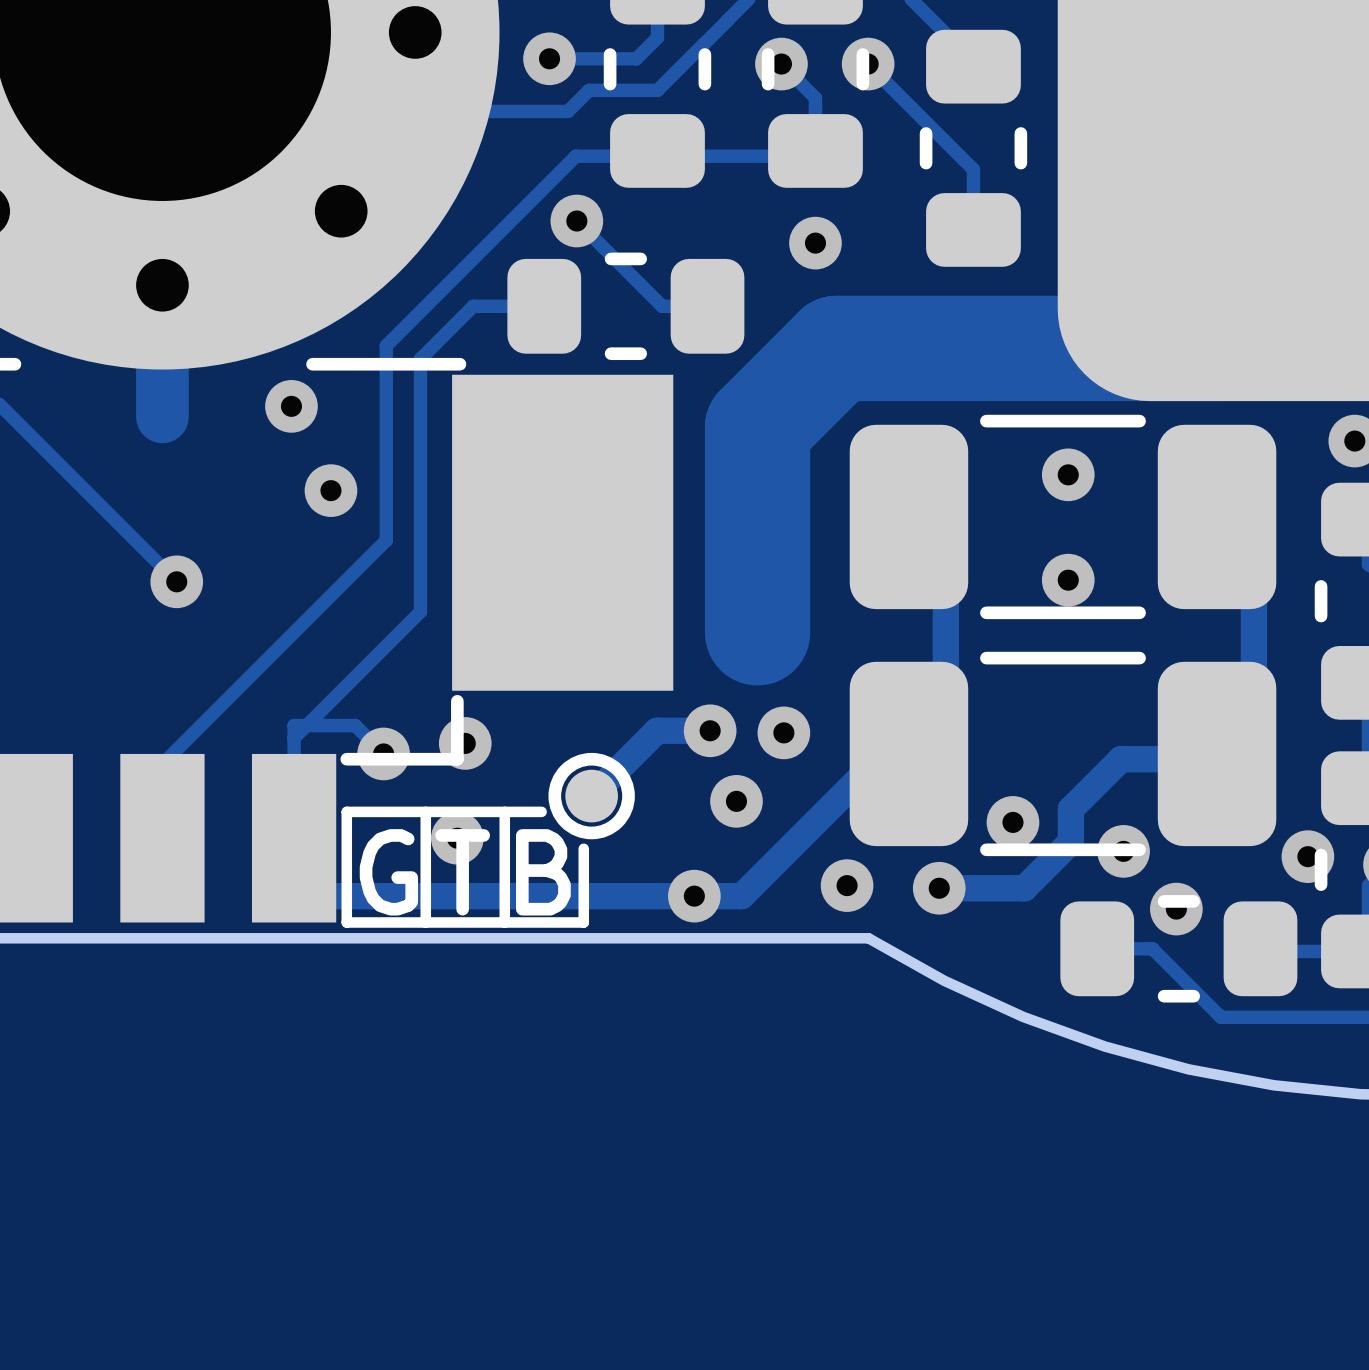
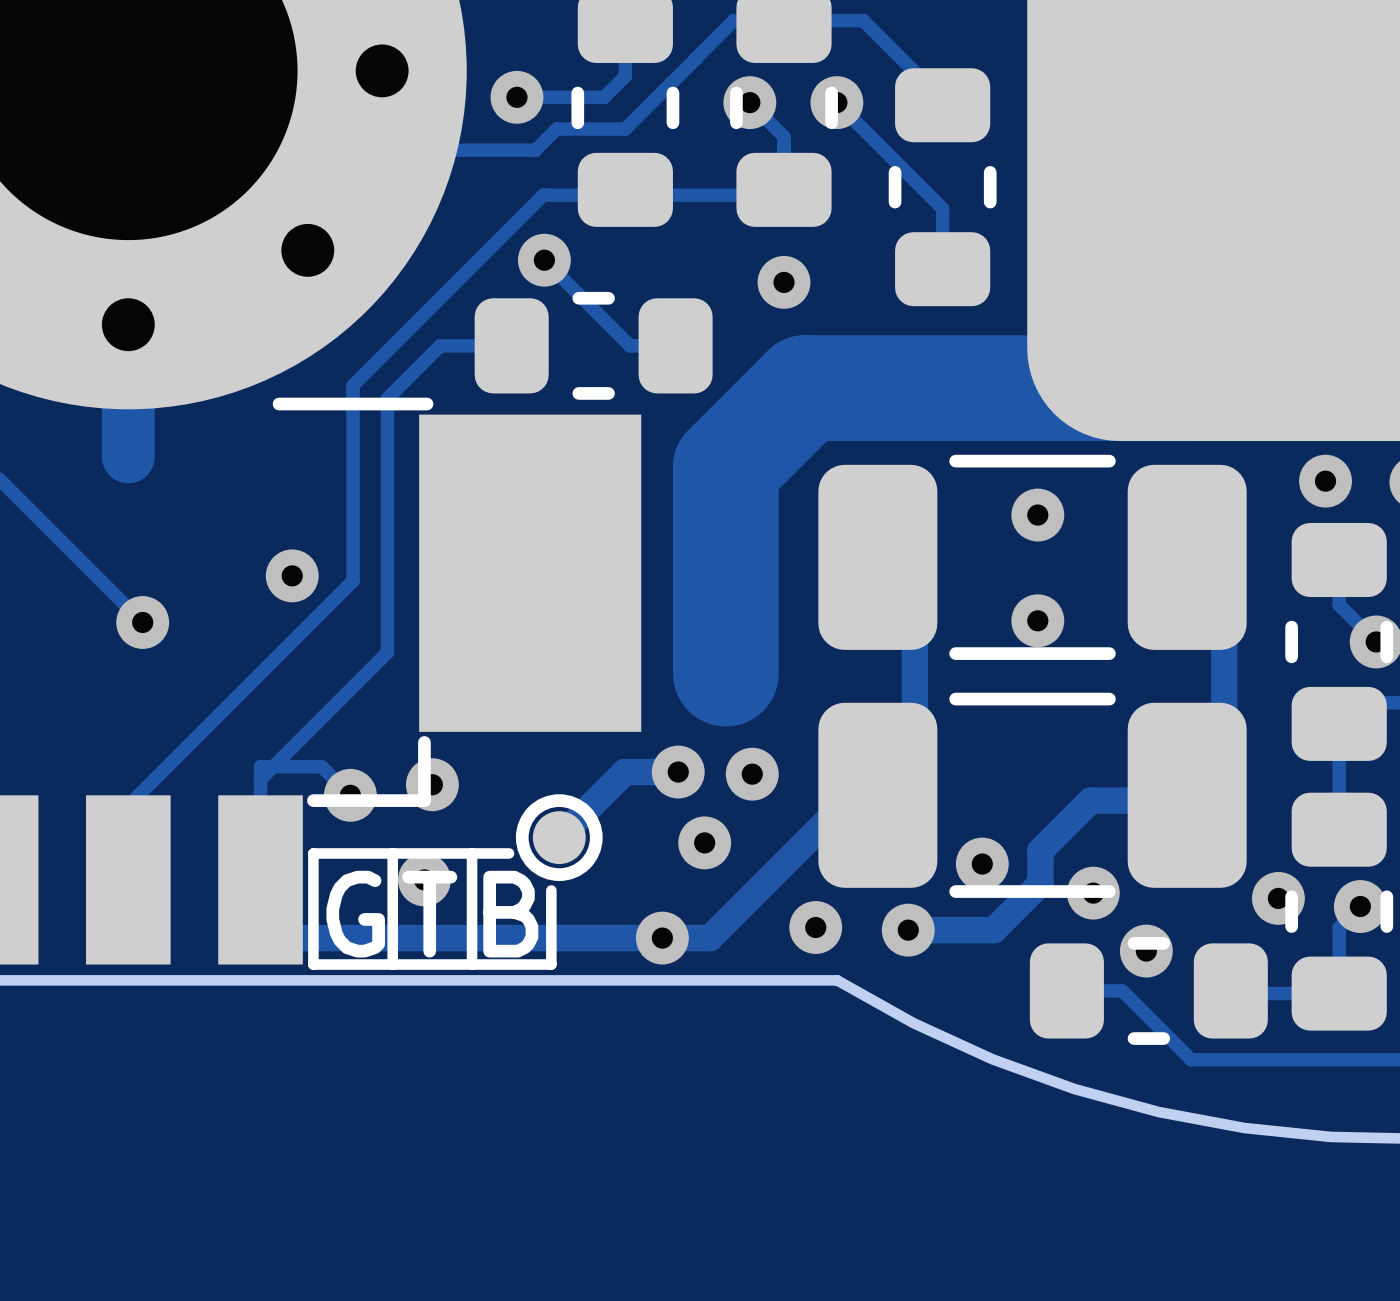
via: (291, 406) -> none
via position: (330, 490) -> (292, 575)

